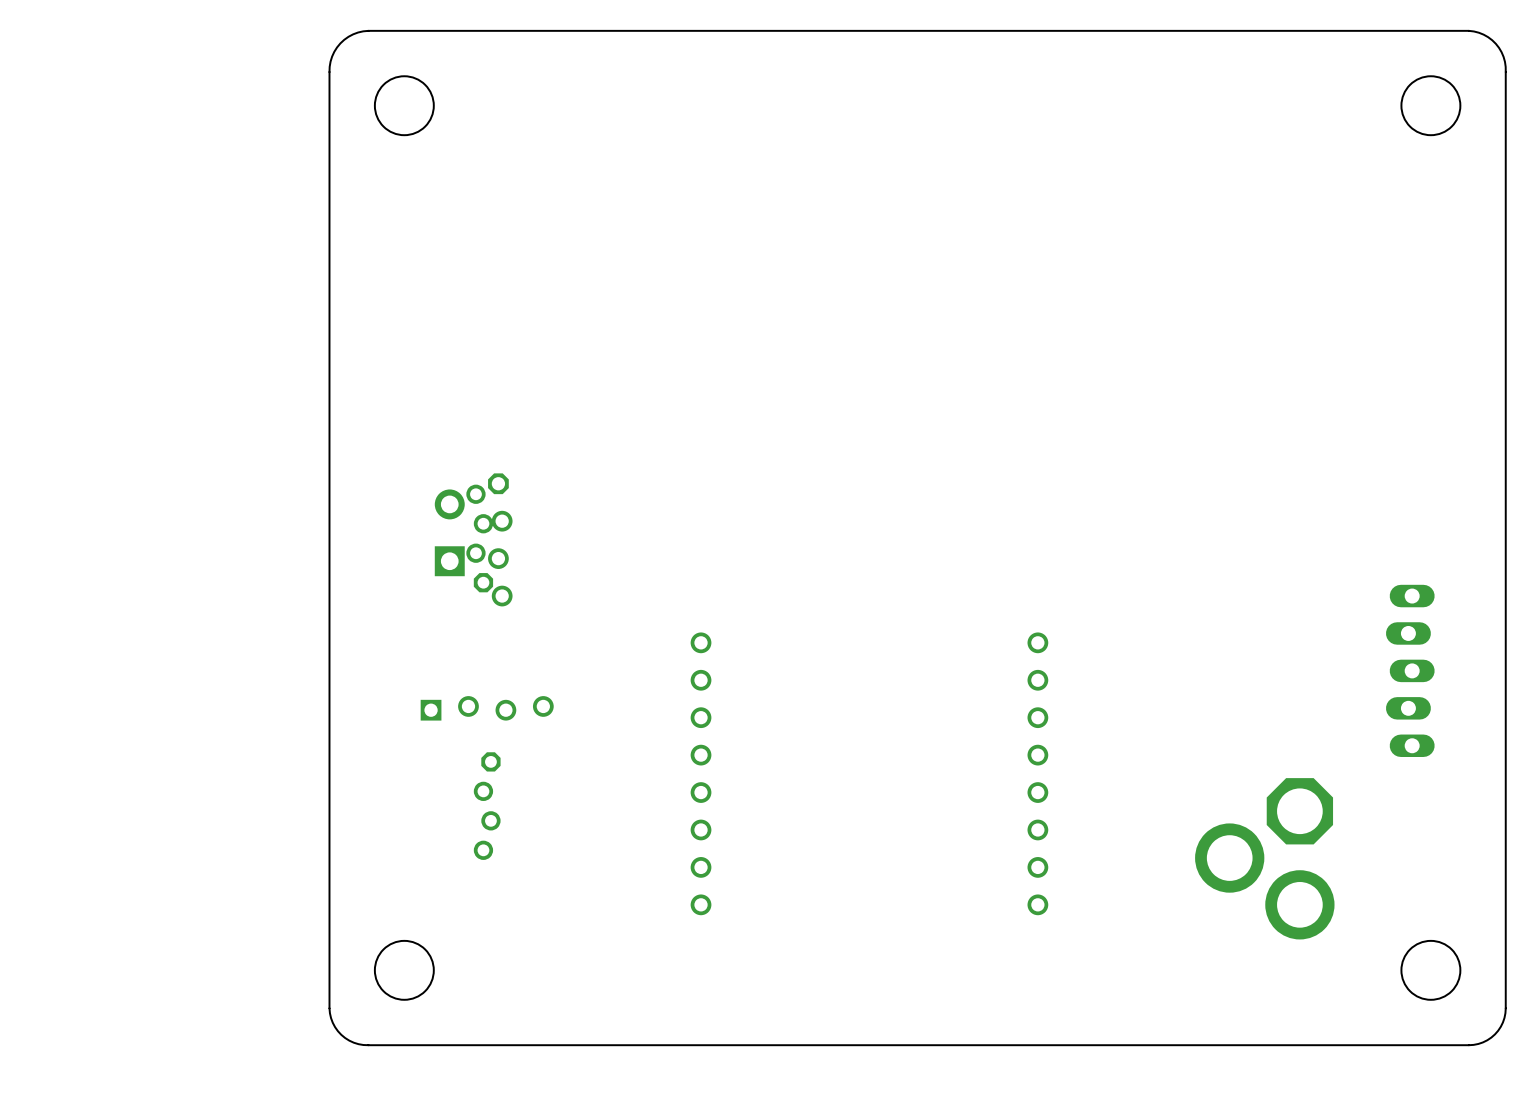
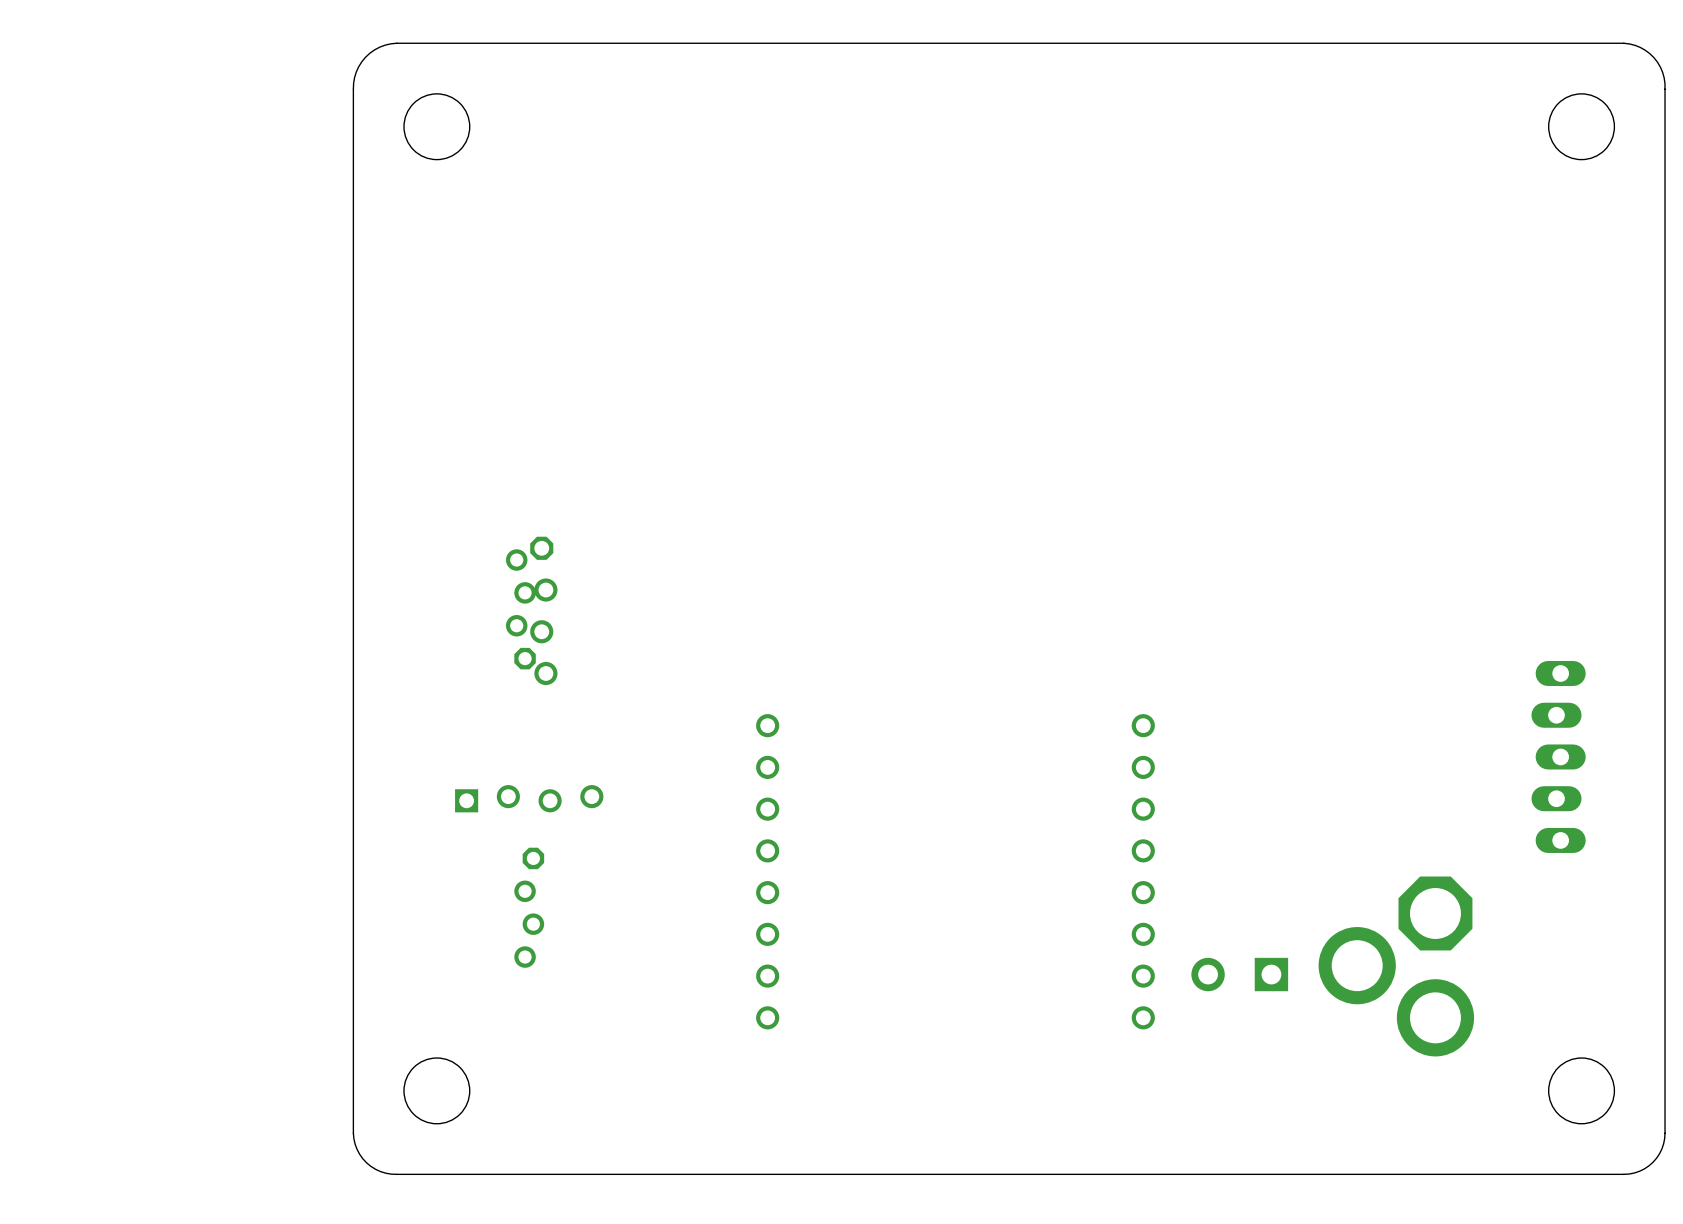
part: (449, 532) -> none
part: none -> (1239, 974)

